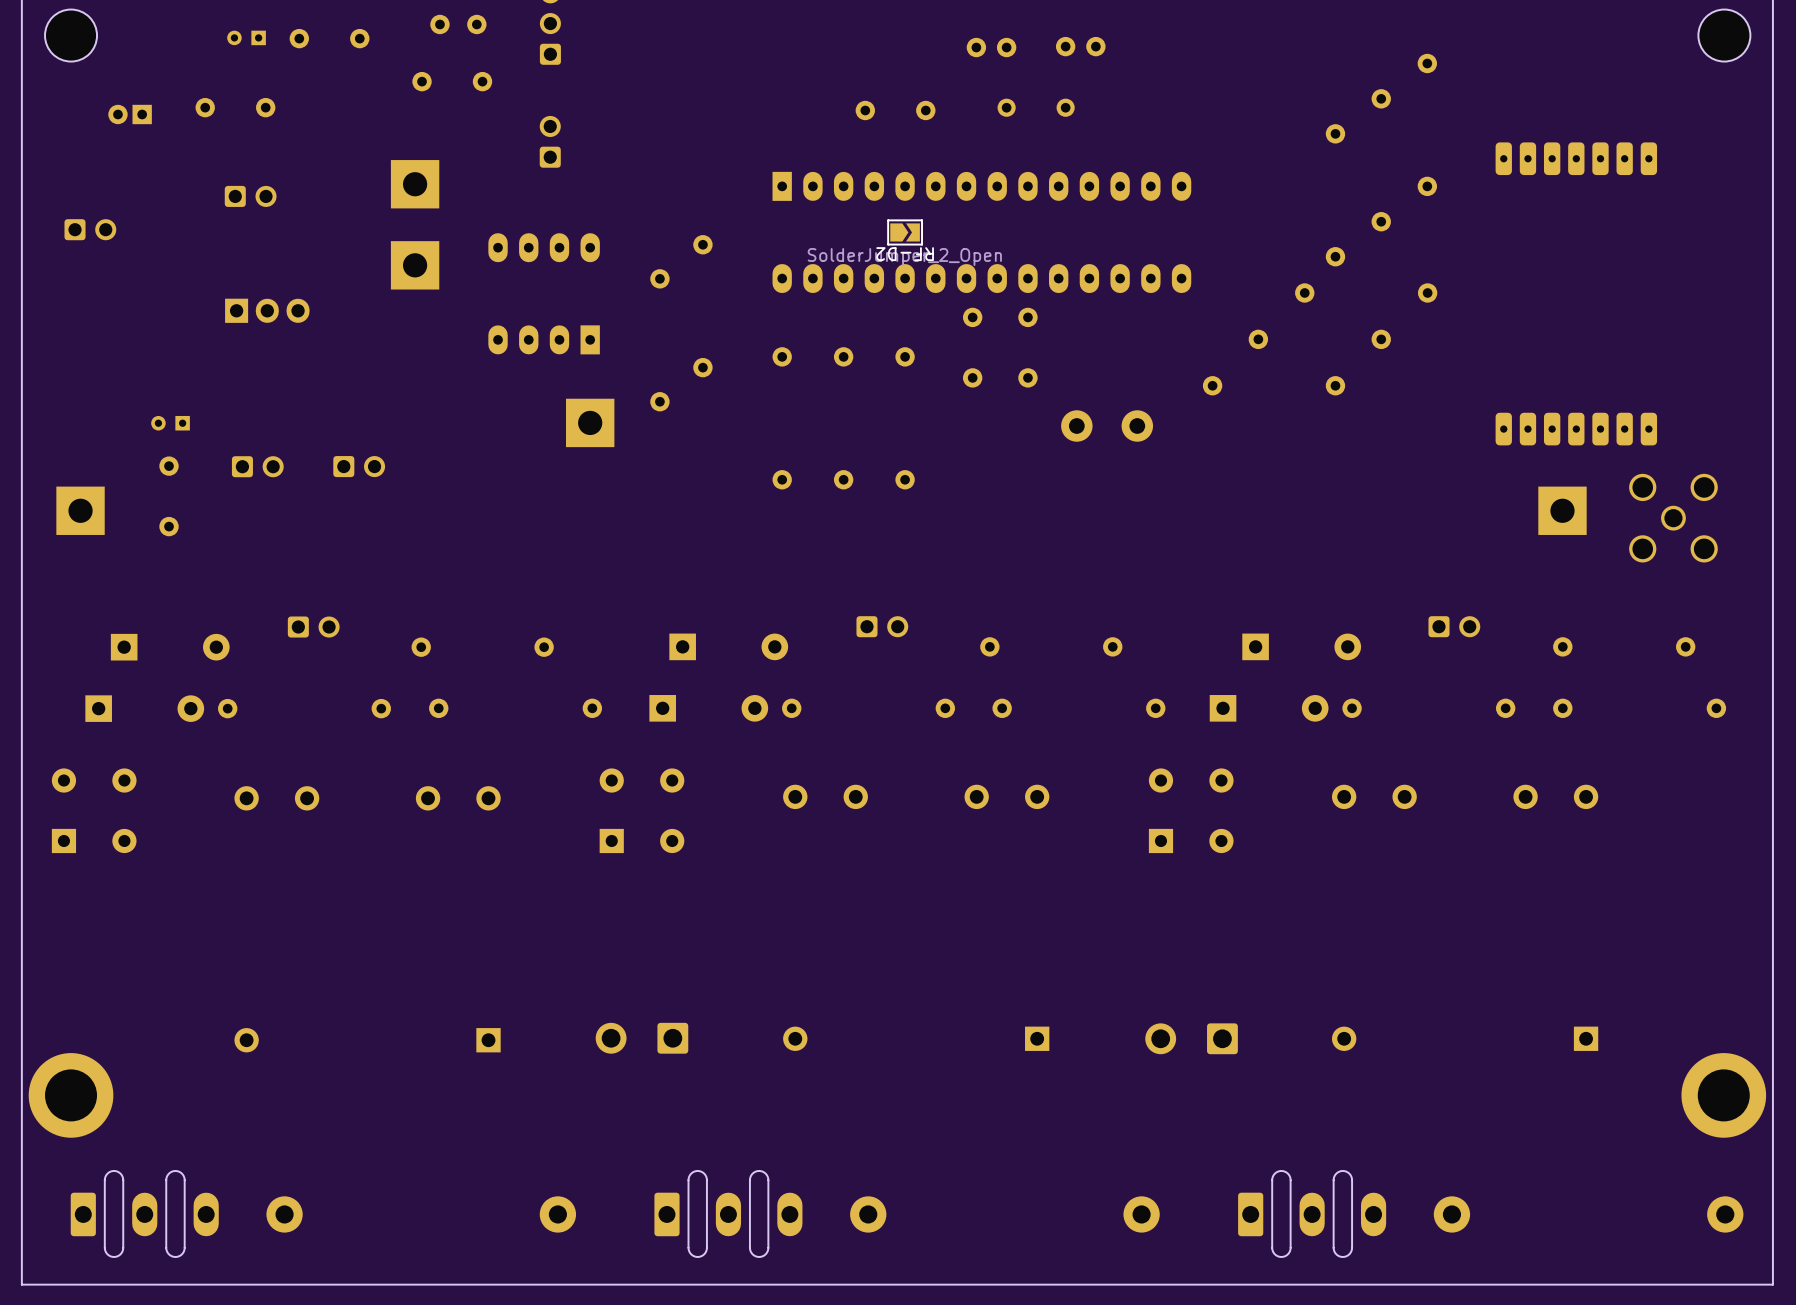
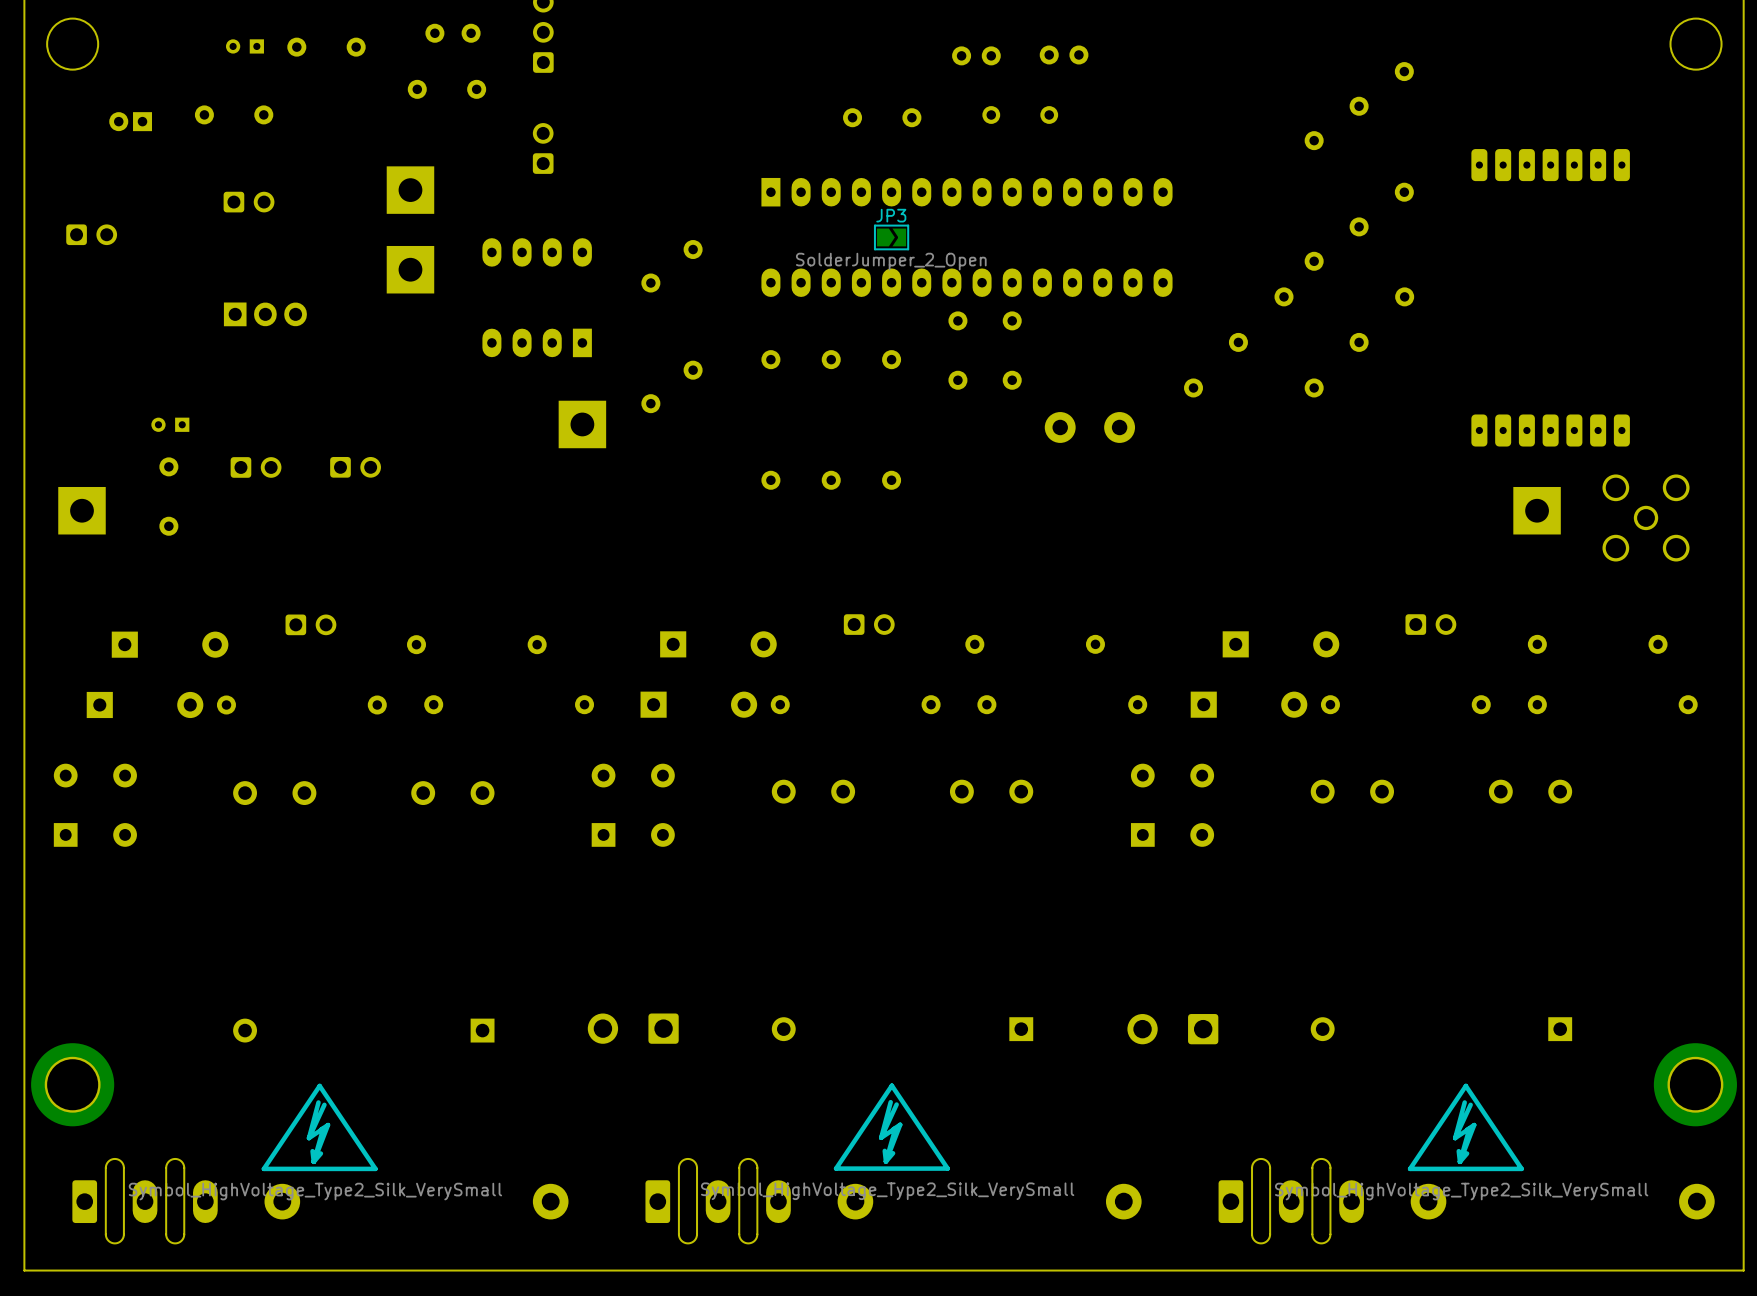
JP3 name: none -> JP3 (891, 215)
JP3 text: RF-D2 (905, 254) -> none
drawing: none -> [261, 1083, 378, 1172]
drawing: none -> [833, 1083, 950, 1171]
drawing: none -> [1407, 1083, 1524, 1172]

